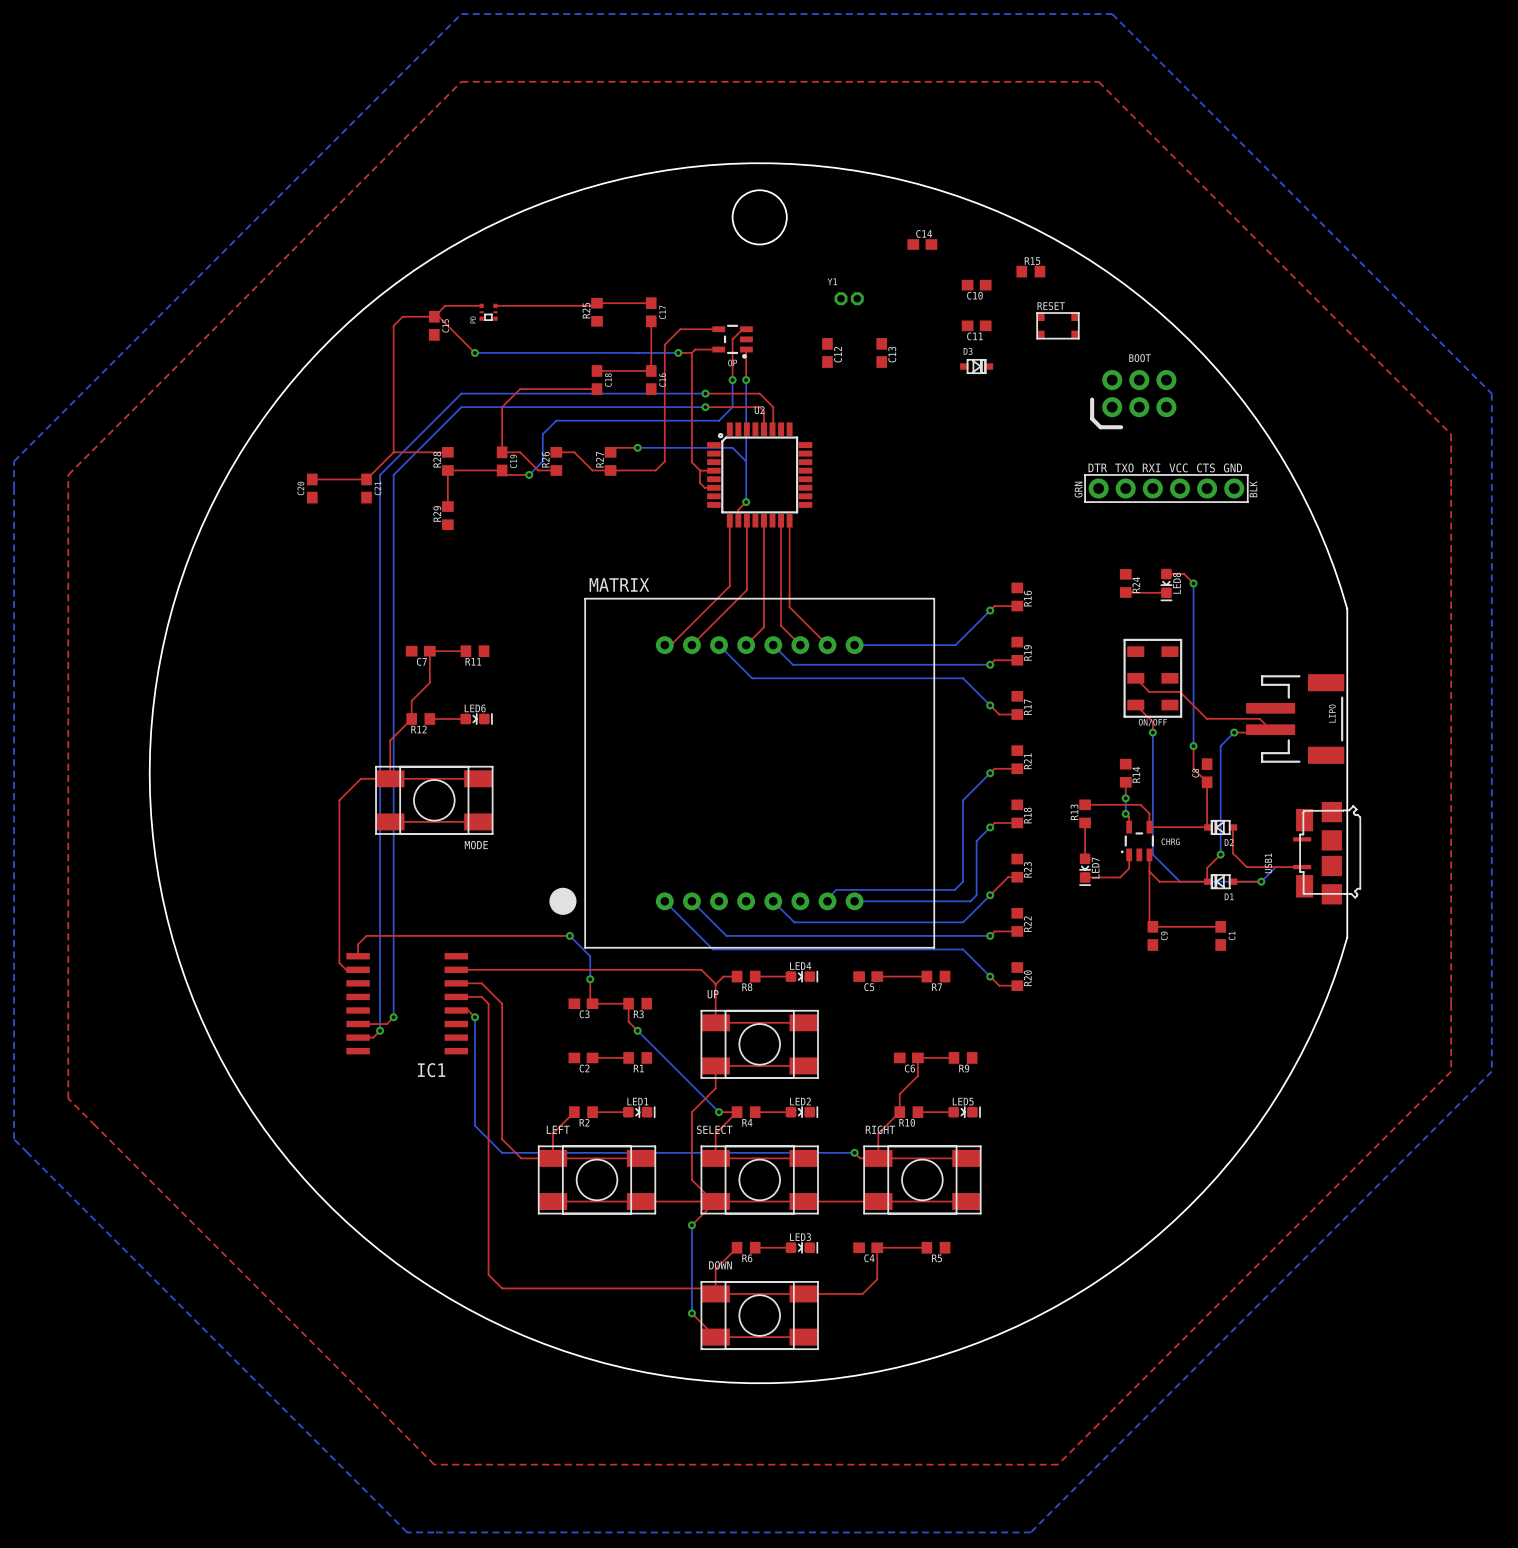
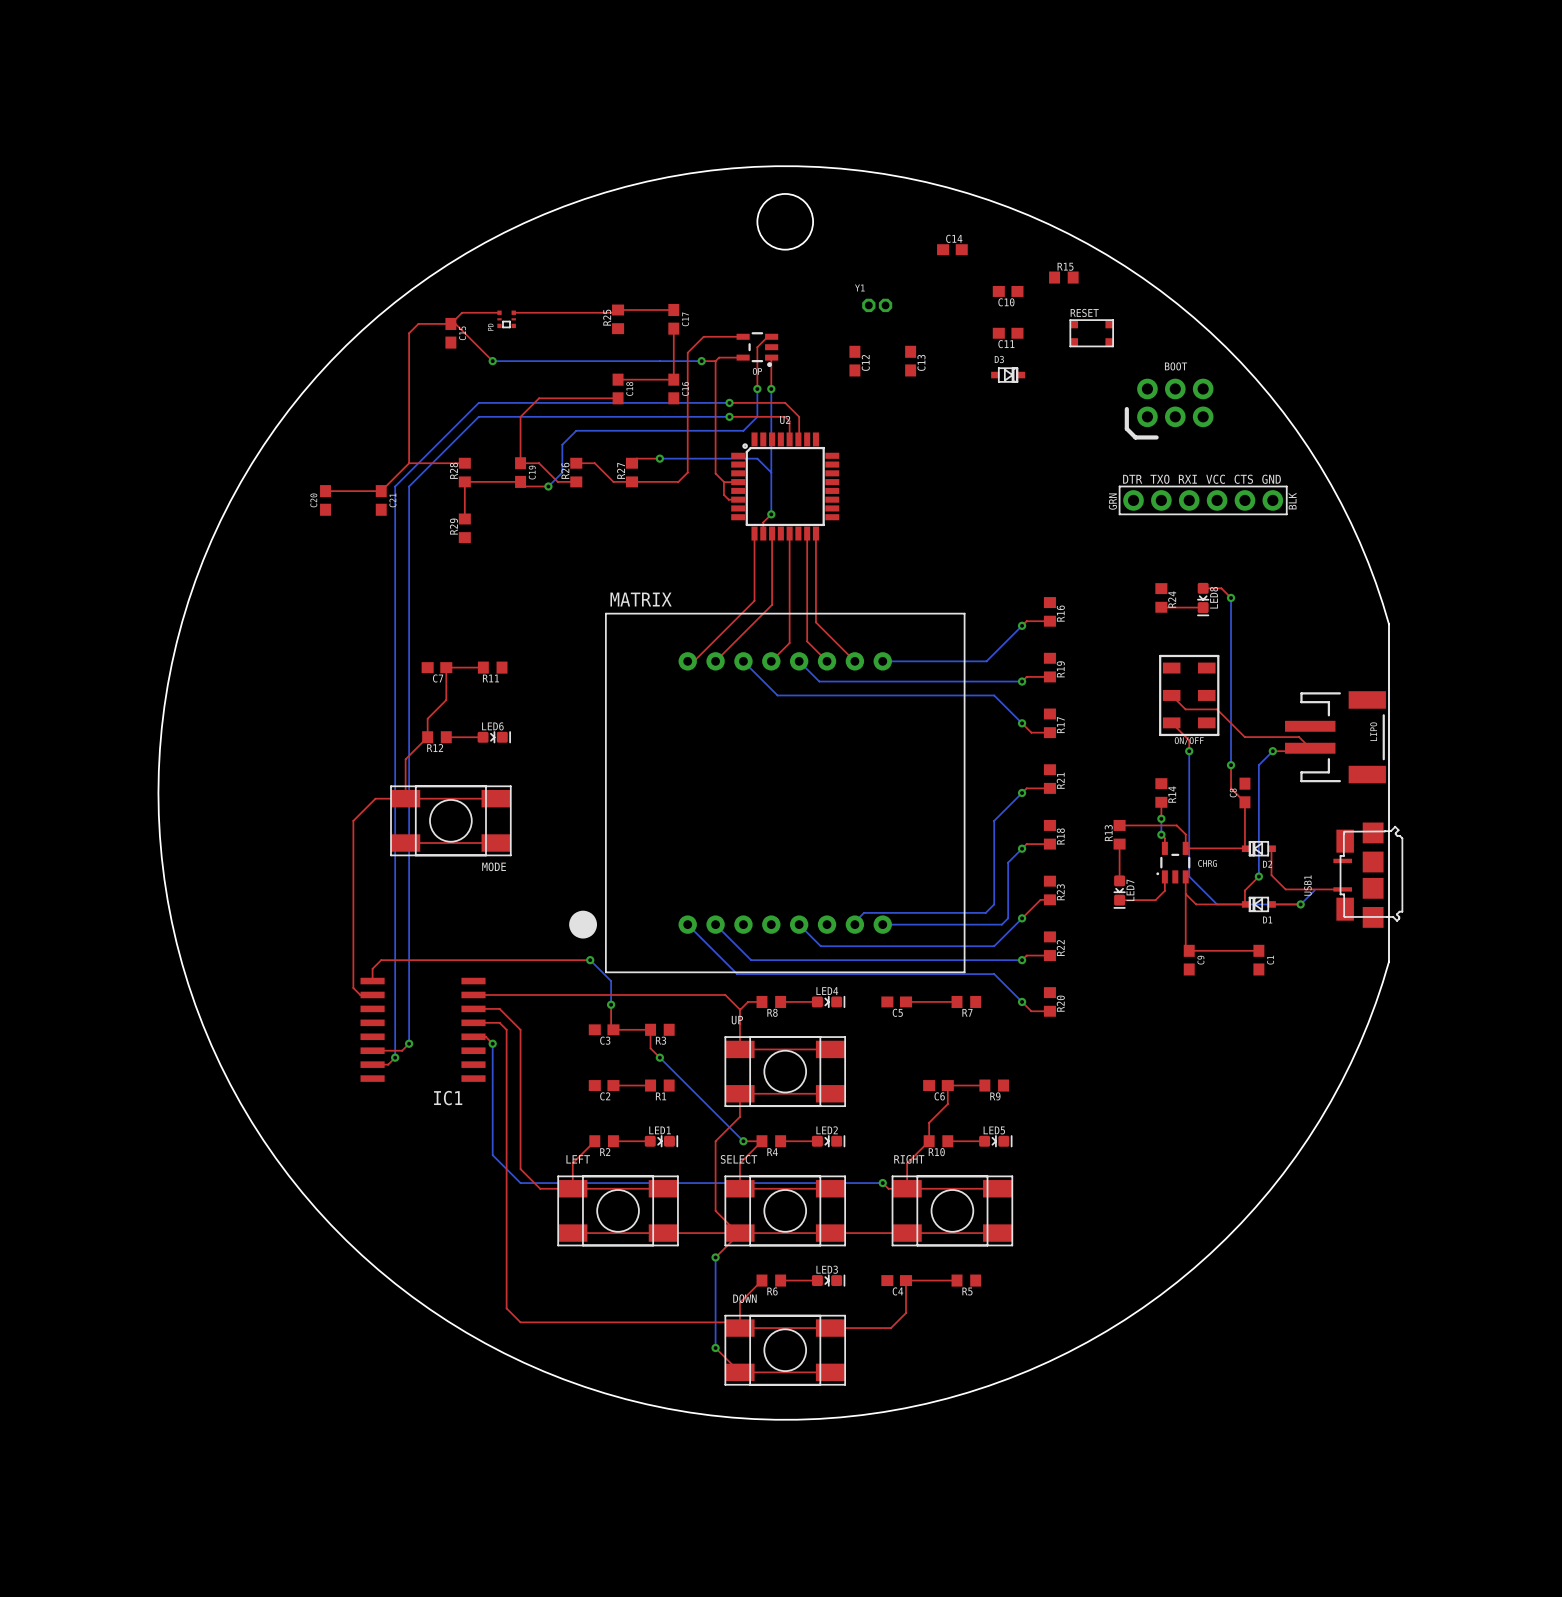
bottom zone outline: (461, 14) (1112, 14) (1491, 393) (1491, 1071) (1030, 1532) (407, 1532) (14, 1139) (14, 461) (461, 14) -> none
top zone outline: (461, 81) (1098, 81) (1451, 434) (1451, 1071) (1057, 1464) (434, 1464) (68, 1098) (68, 474) (461, 81) -> none

